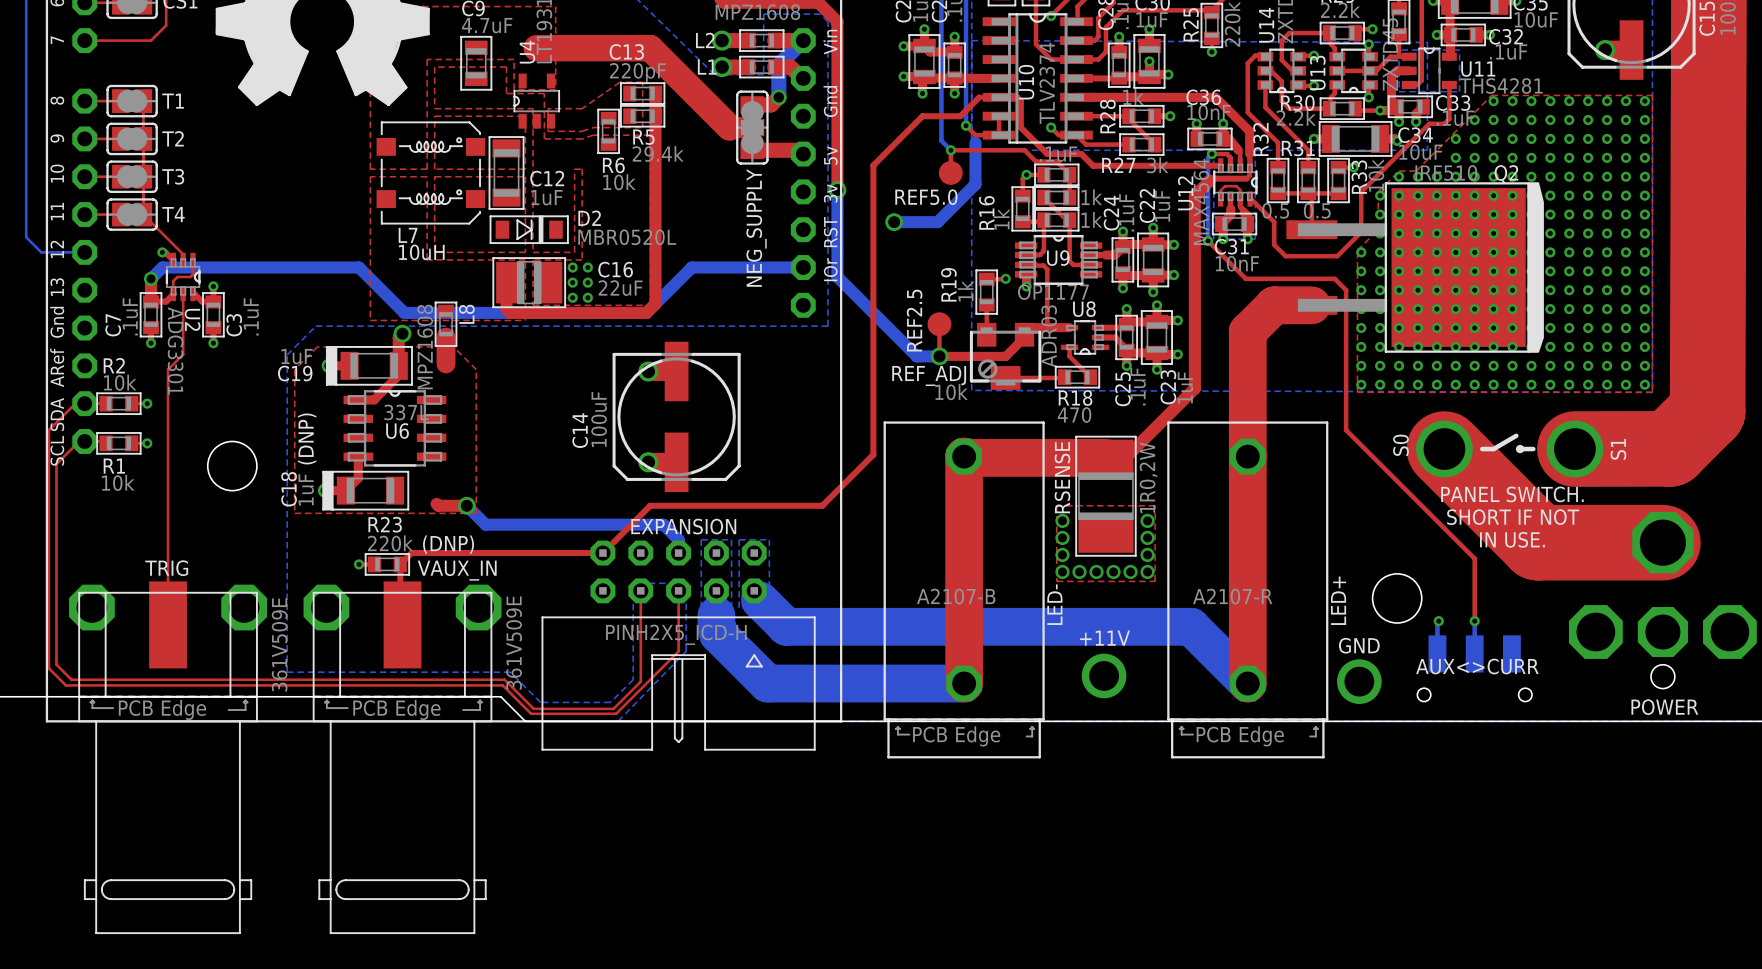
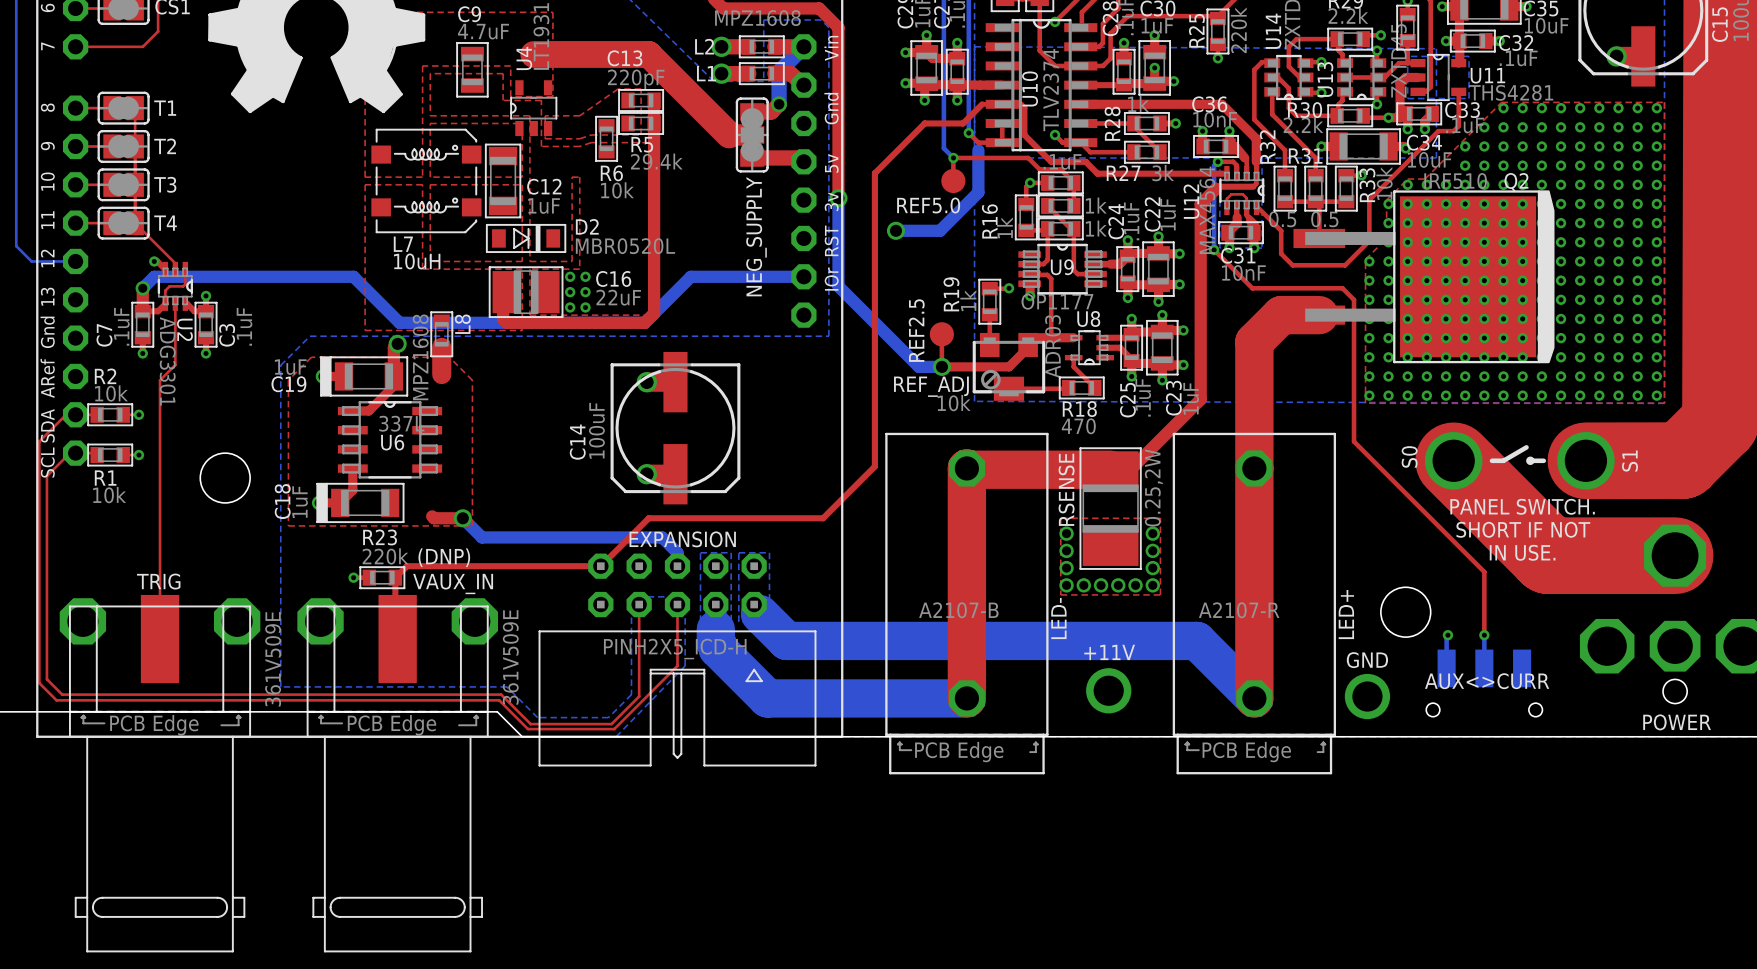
text: (DNP) (307, 438) -> none
RSENSE value: 1R0,2W (1148, 477) -> 0.25,2W (1153, 487)

